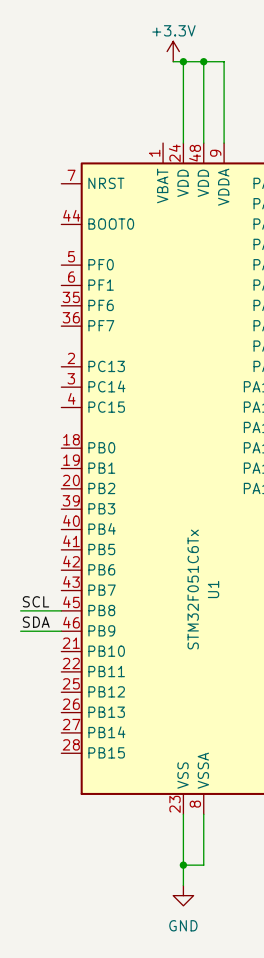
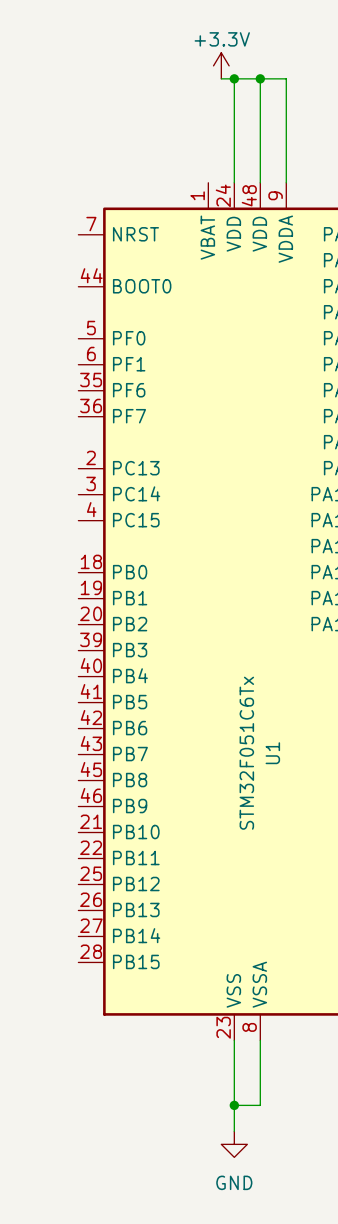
label: SCL (36, 601) -> none
wire: (20, 610) (61, 610) -> none
label: SDA (36, 622) -> none
wire: (20, 631) (61, 631) -> none

